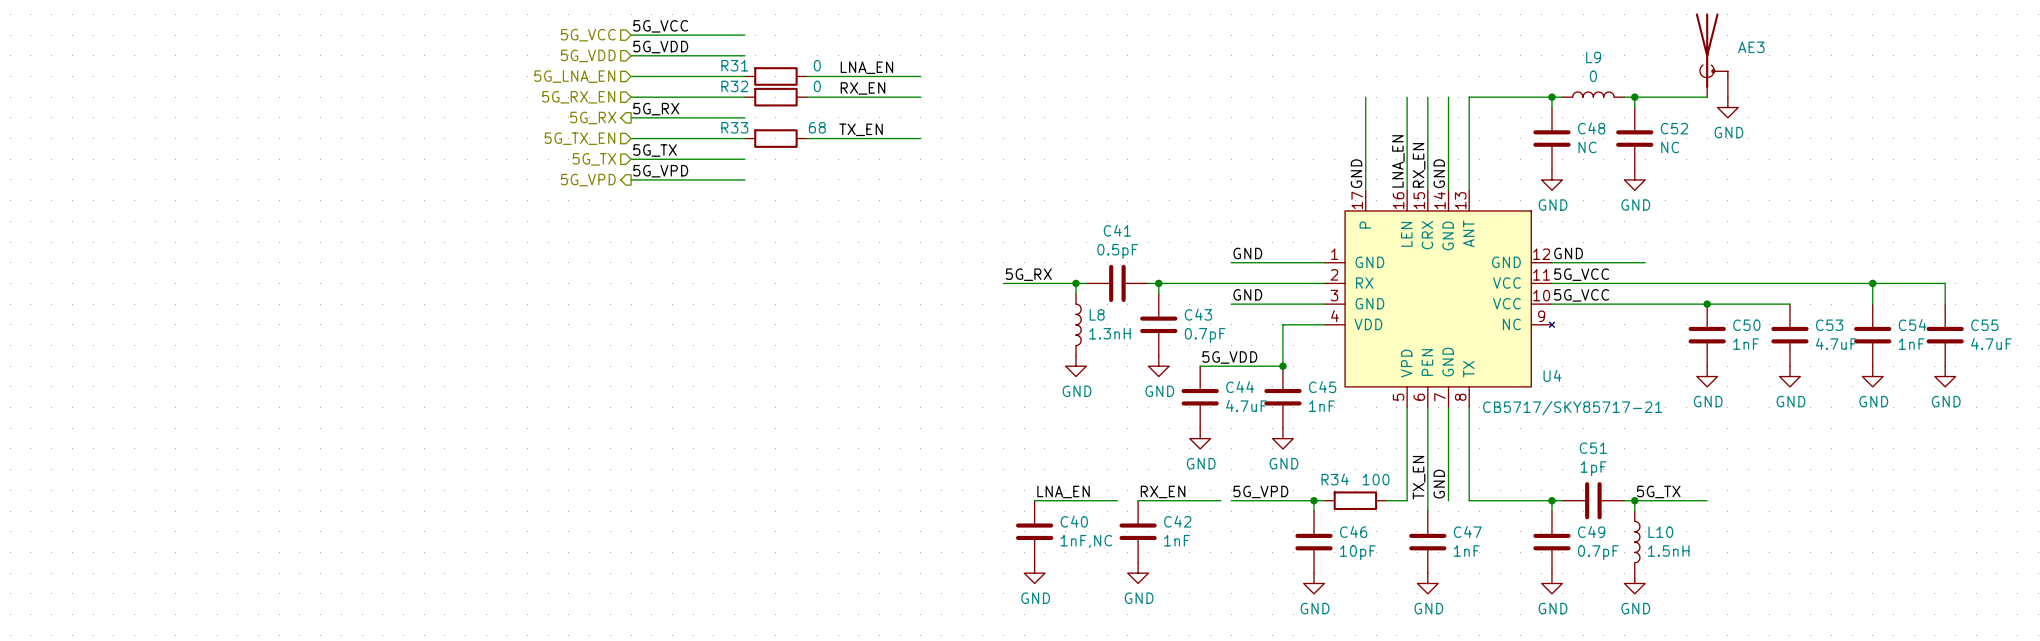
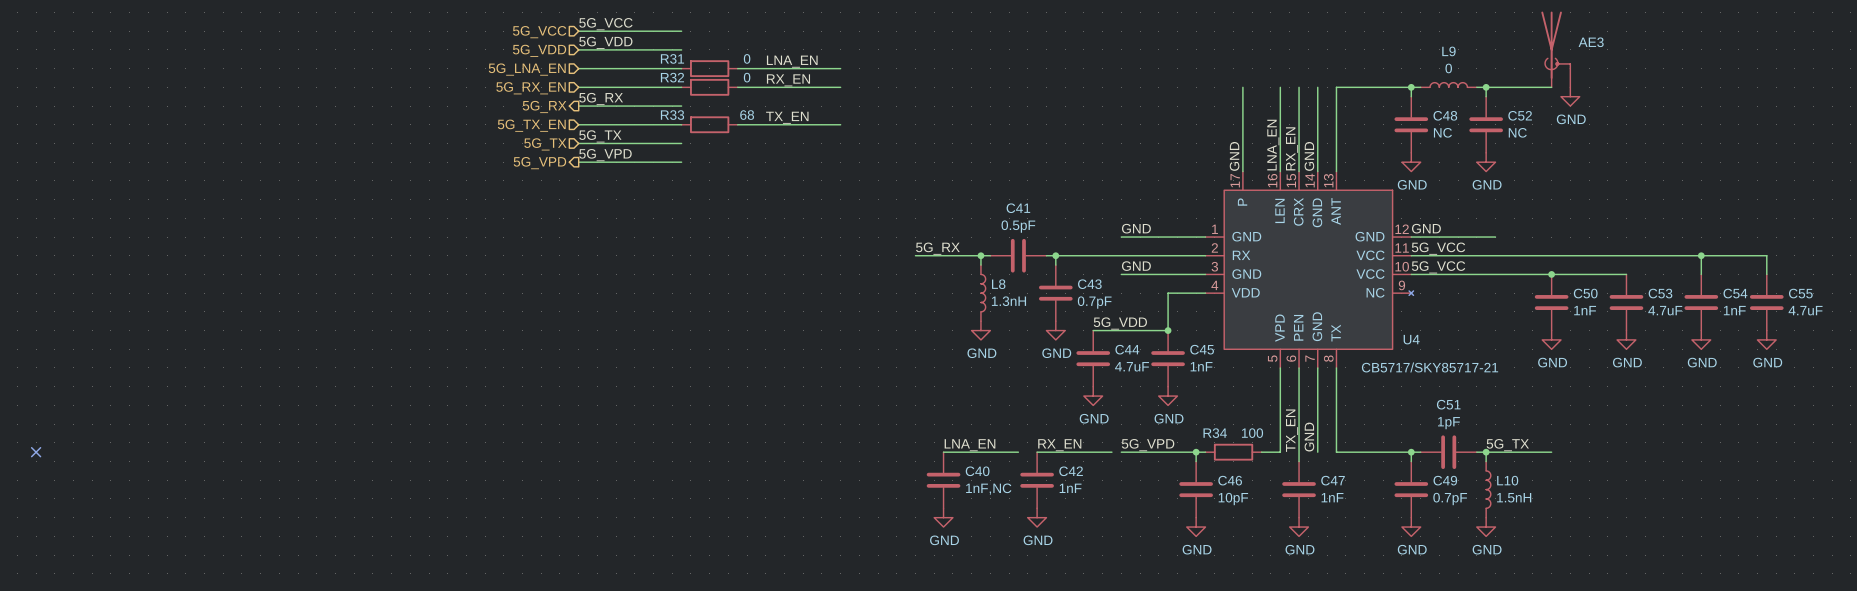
no-connect mark: none -> (36, 452)

